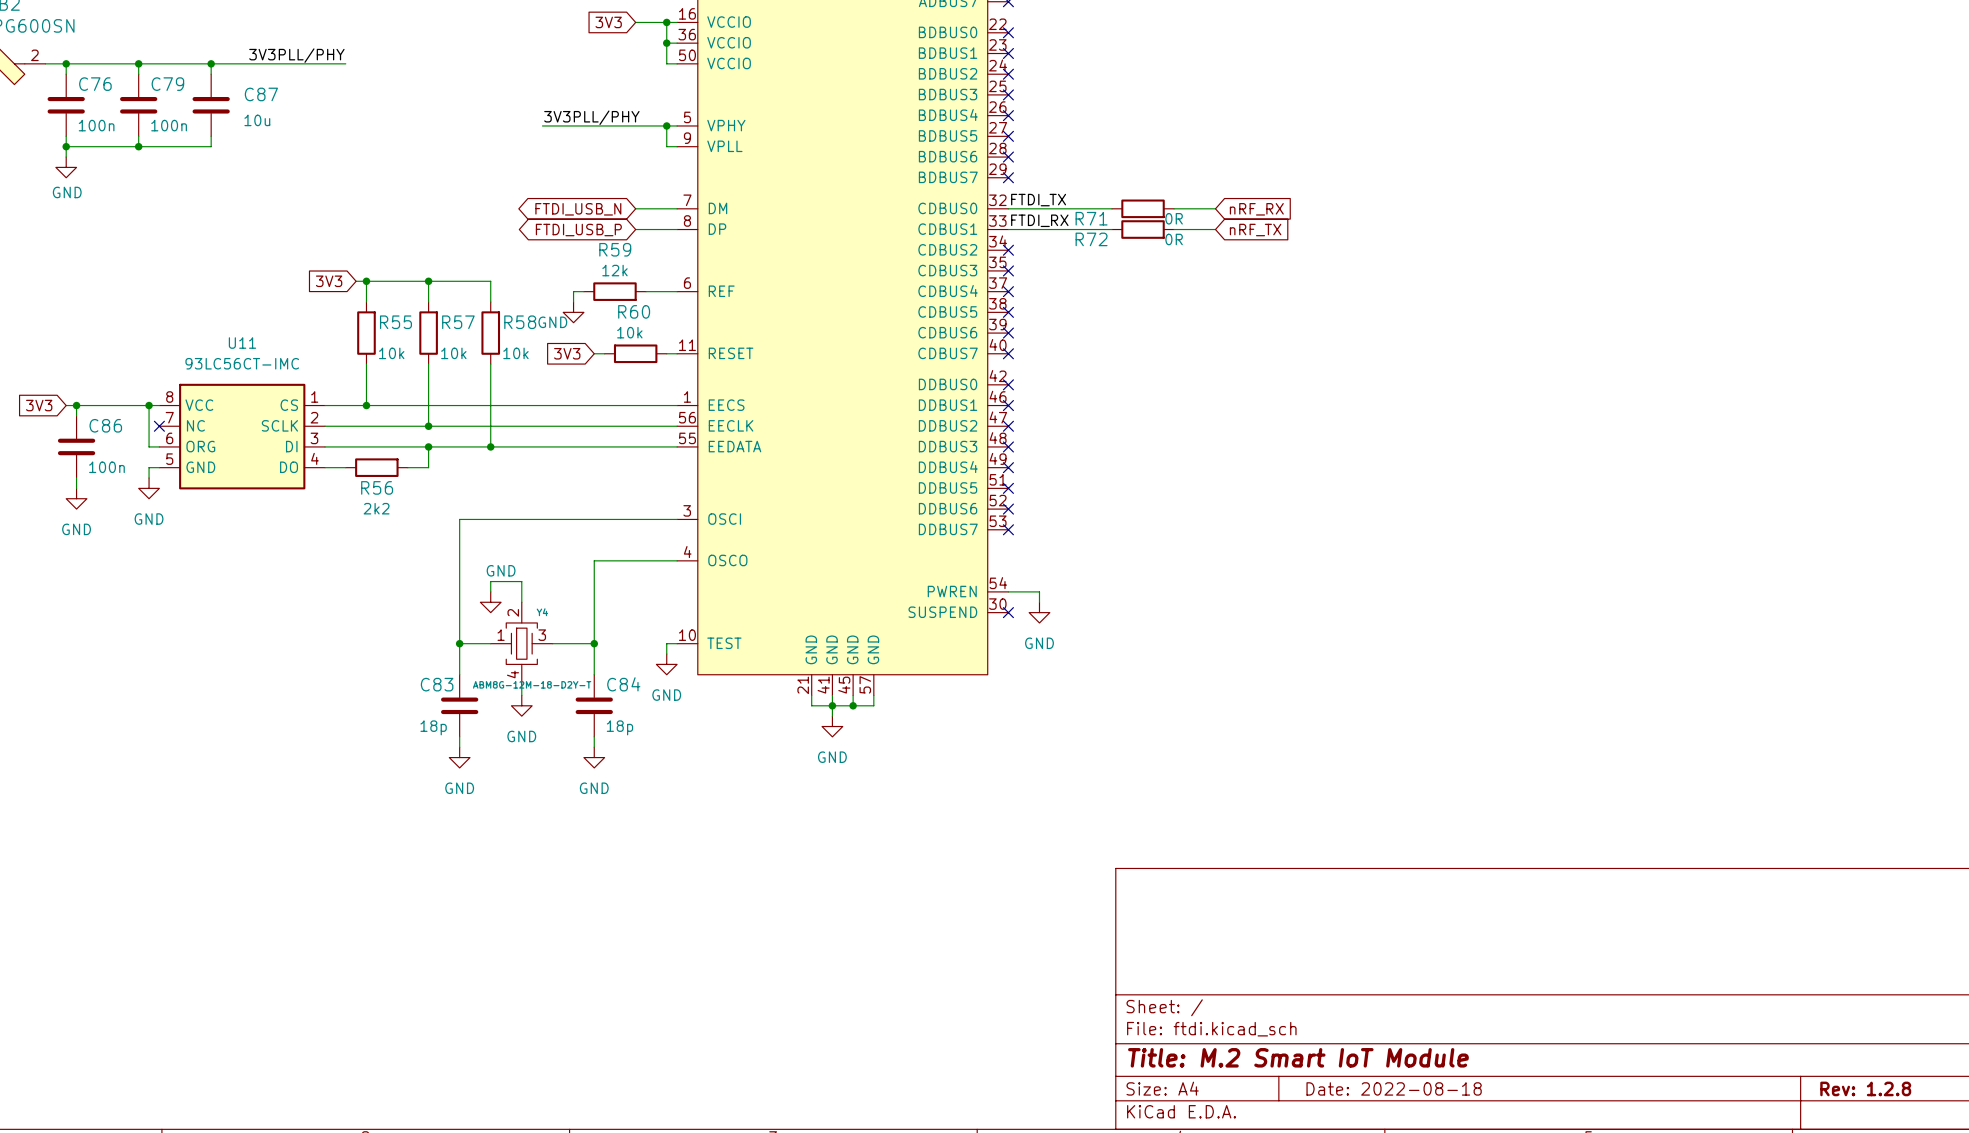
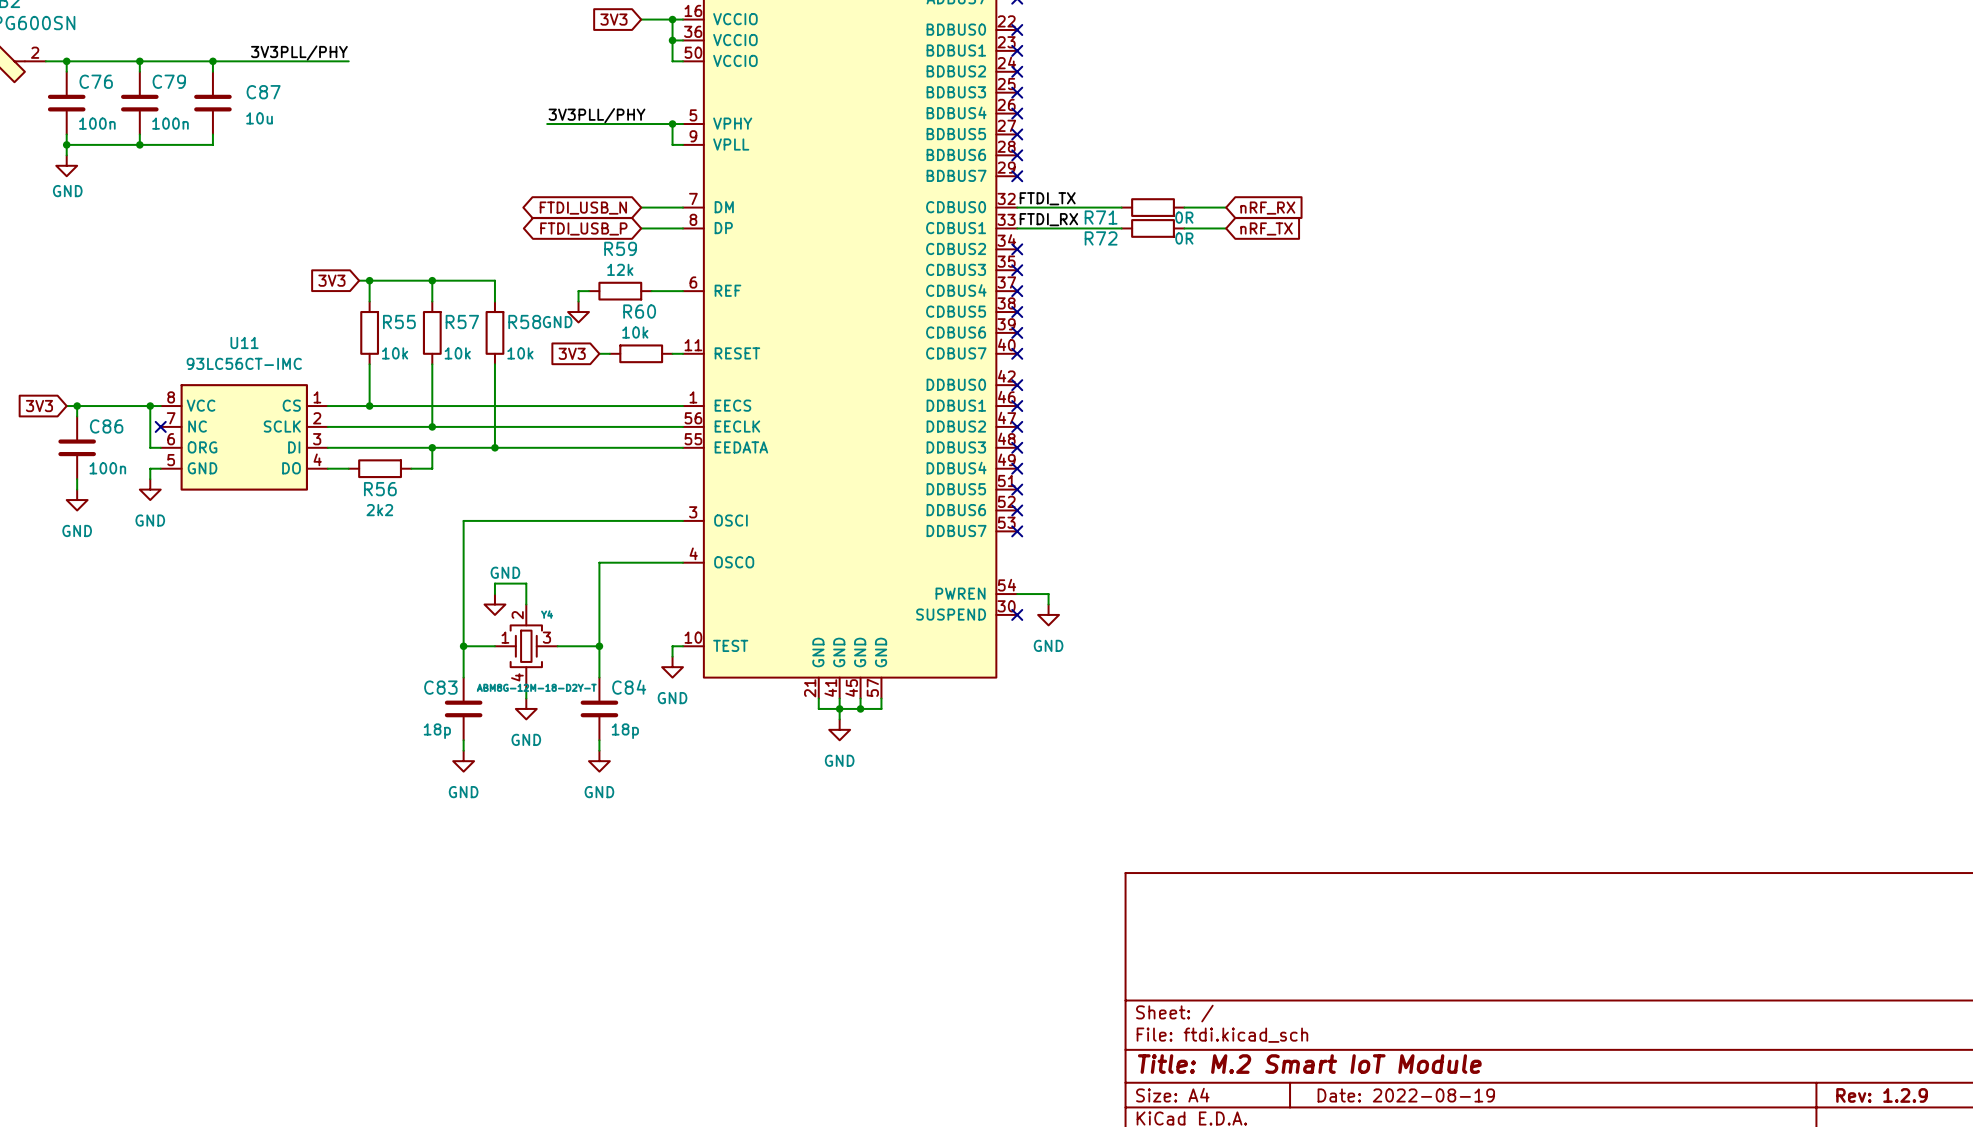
title block: Date: 2022-08-18 (1394, 1088) -> Date: 2022-08-19 (1406, 1095)
title block: Rev: 1.2.8 (1865, 1088) -> Rev: 1.2.9 (1882, 1095)

